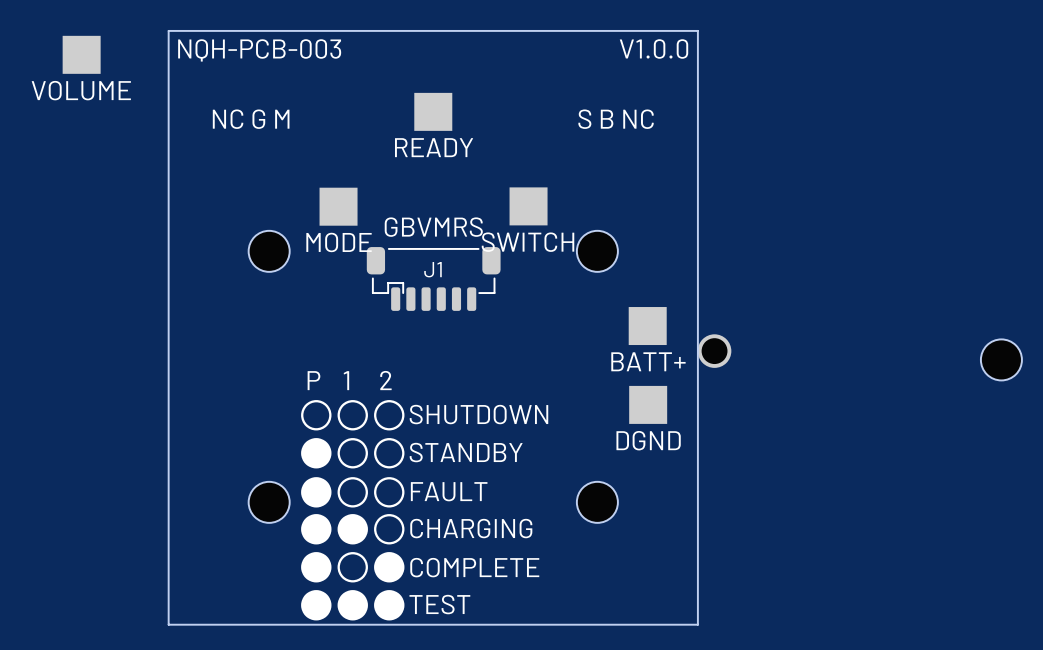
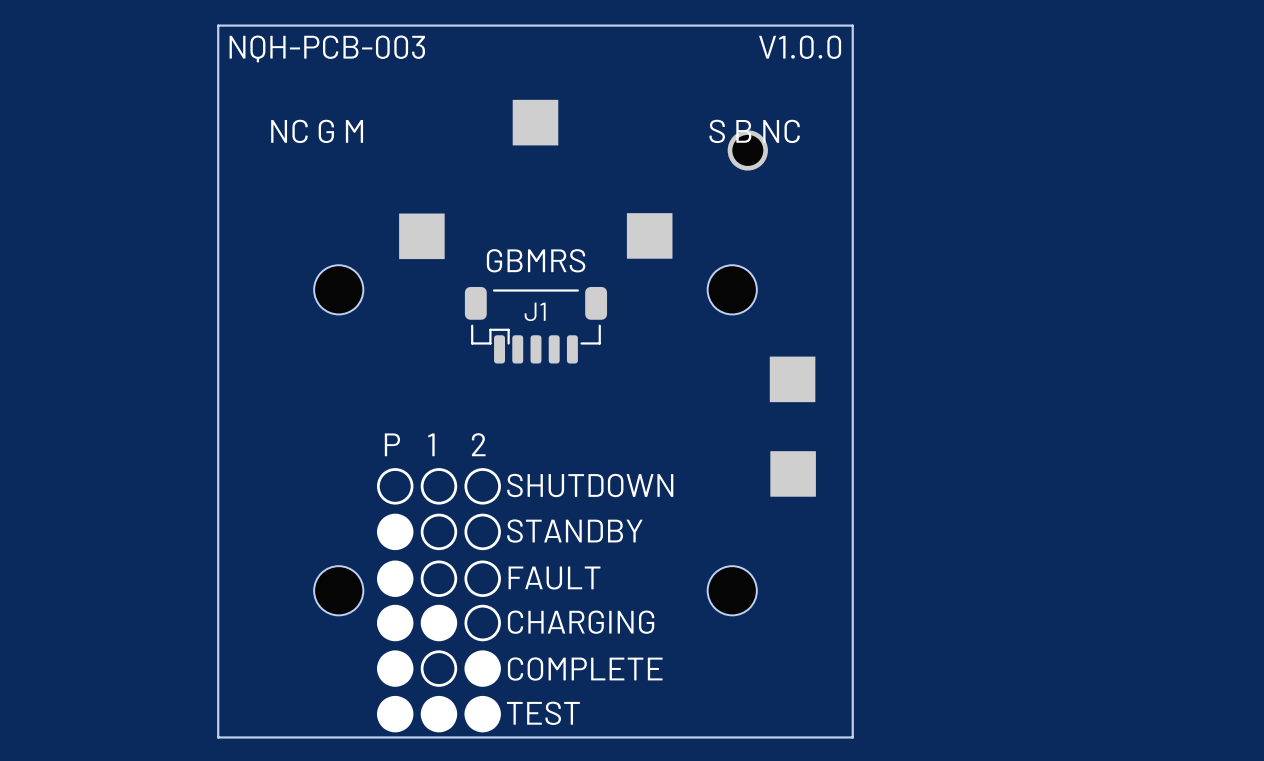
part: (81, 54) -> none
part text: READY (434, 147) -> none
text: GBVMRS (433, 227) -> GBMRS (536, 260)
part text: MODE (339, 242) -> none
part text: SWITCH (528, 242) -> none
J1 footprint: [366, 247, 501, 311] -> [464, 286, 608, 364]
part position: (714, 351) -> (747, 150)
part: (1001, 359) -> none
part text: BATT+ (648, 361) -> none
part text: DGND (648, 440) -> none

